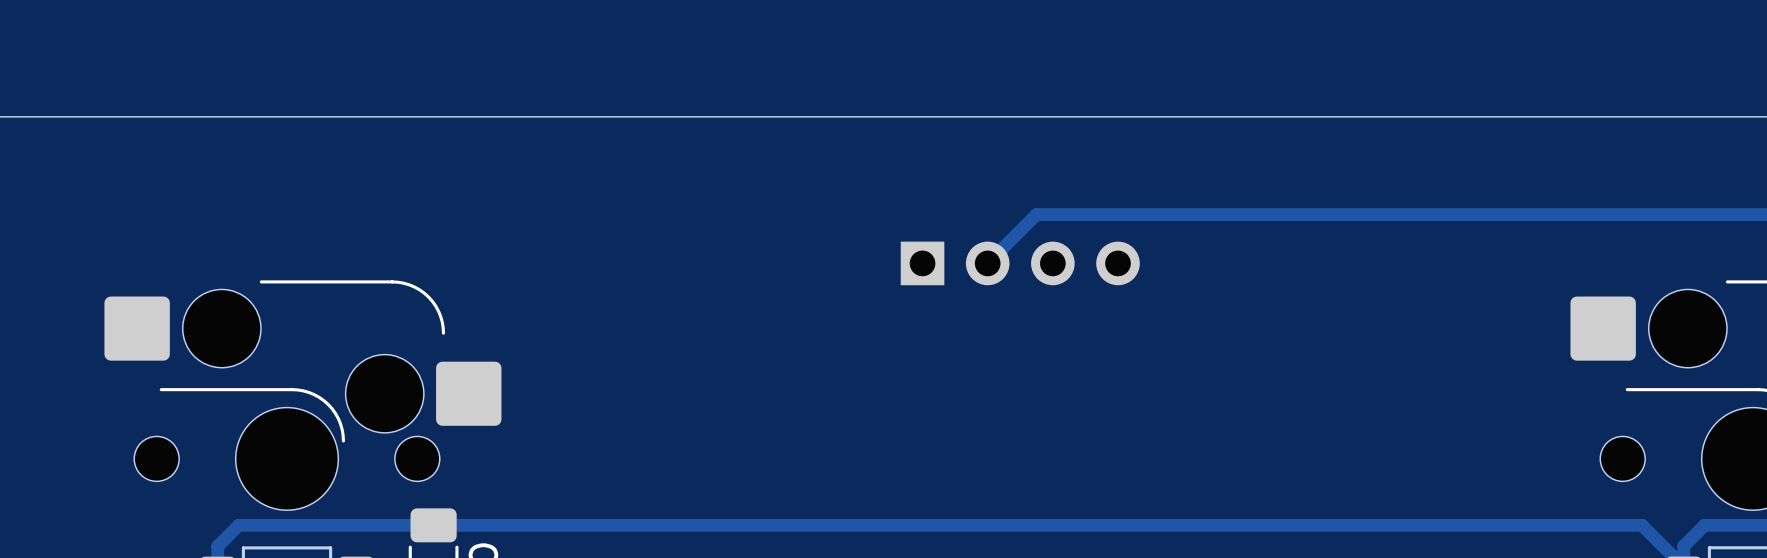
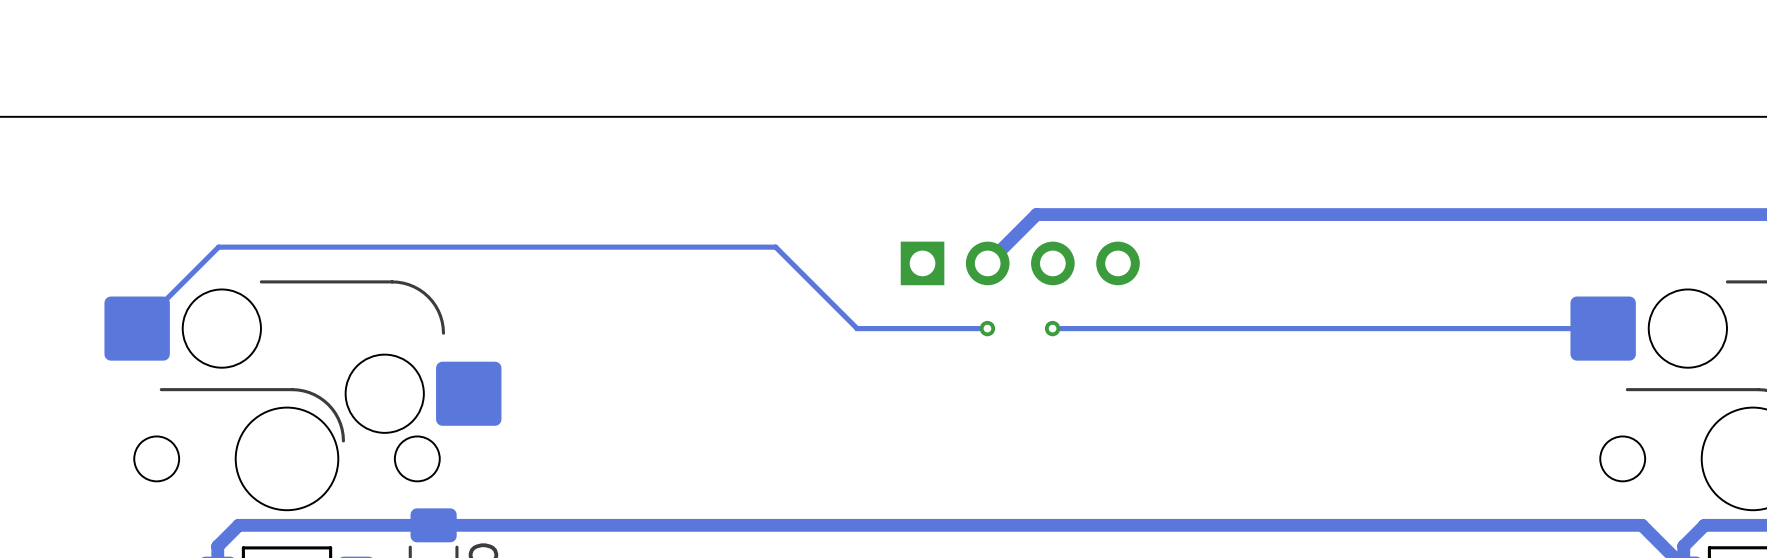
track: none -> (987, 328) (857, 328) (775, 247) (218, 247) (137, 328)
via: none -> (987, 328)
via: none -> (1052, 328)
track: none -> (1603, 328) (1052, 328)

